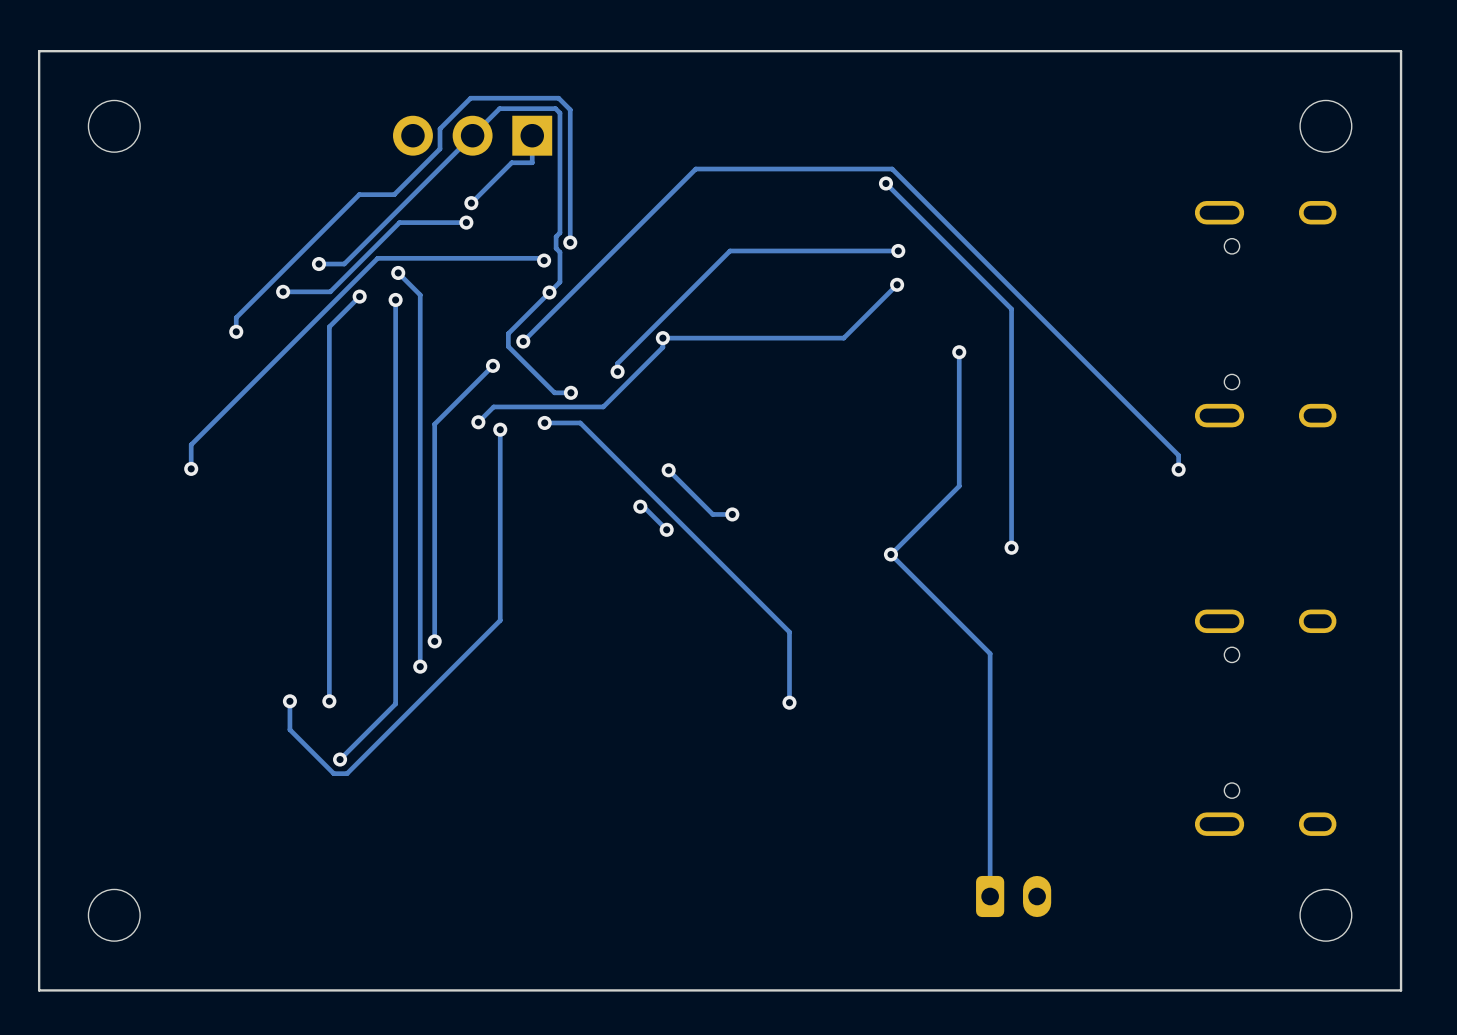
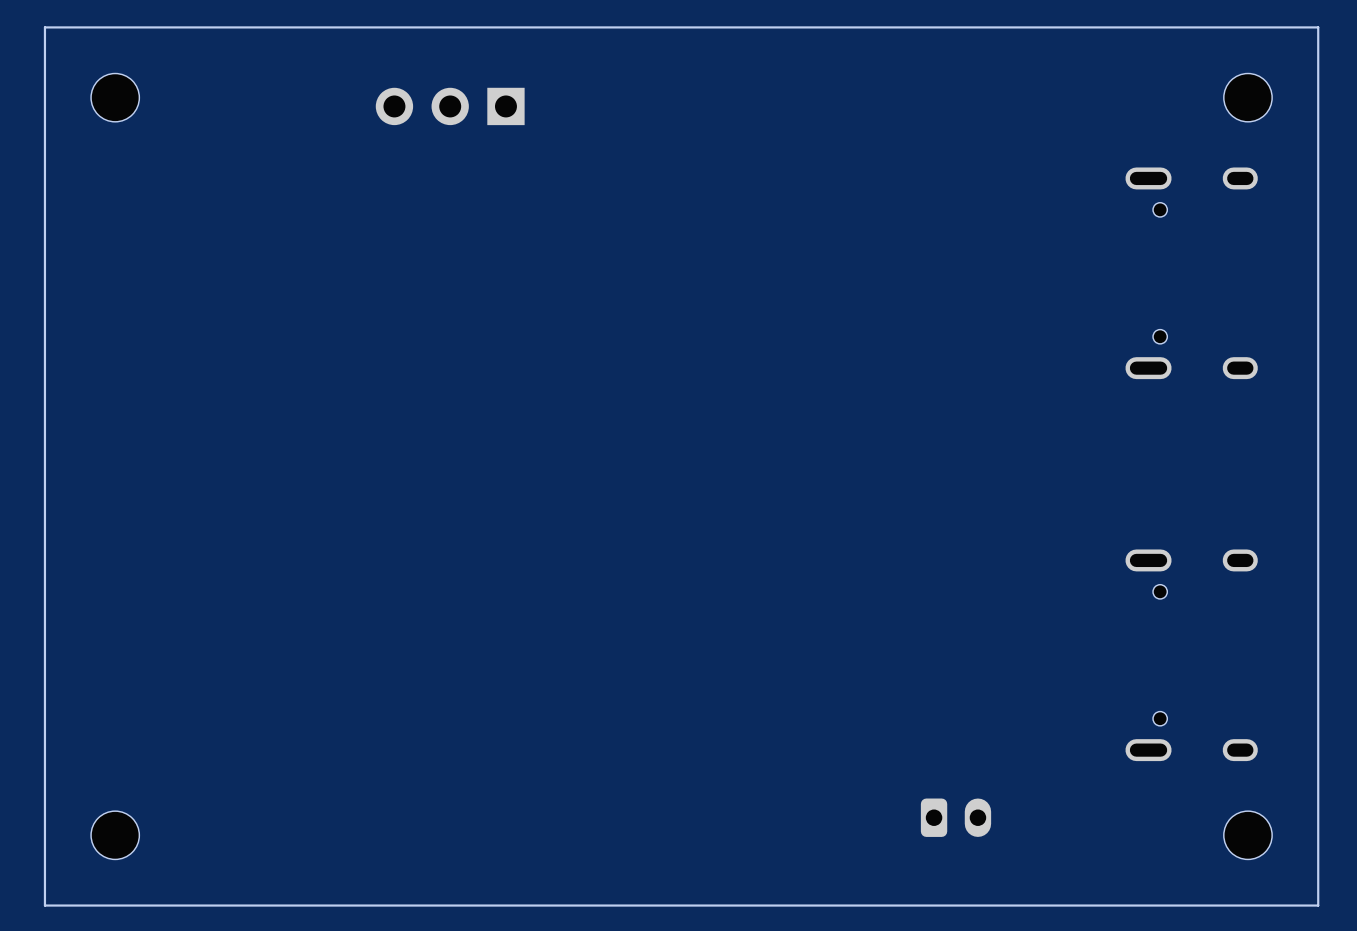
track: (532, 135) (532, 162) (511, 162) (471, 203) -> none
track: (885, 183) (1011, 309) (1011, 547) -> none
via: (885, 183) -> none
via: (471, 203) -> none
track: (466, 222) (399, 222) (330, 291) (283, 291) -> none
via: (466, 222) -> none
track: (570, 242) (570, 109) (558, 98) (470, 98) (440, 128) (440, 148) (394, 194) (359, 194) (236, 317) (236, 331) -> none
via: (570, 242) -> none
track: (898, 250) (730, 250) (617, 363) (617, 371) -> none
via: (898, 250) -> none
track: (544, 260) (541, 258) (377, 258) (191, 444) (191, 468) -> none
via: (544, 260) -> none
track: (318, 264) (344, 264) (499, 108) (555, 108) (559, 113) (559, 232) (556, 236) (556, 248) (559, 252) (559, 282) (508, 333) (508, 346) (554, 392) (570, 392) -> none
via: (318, 264) -> none
track: (398, 272) (420, 294) (420, 666) -> none
via: (398, 272) -> none
track: (897, 284) (843, 338) (662, 338) (662, 347) (603, 406) (493, 406) (478, 422) -> none
via: (897, 284) -> none
via: (283, 291) -> none
via: (549, 292) -> none
track: (359, 296) (329, 326) (329, 701) -> none
via: (359, 296) -> none
track: (395, 299) (395, 703) (340, 759) -> none
via: (395, 299) -> none
via: (236, 331) -> none
via: (662, 338) -> none
track: (523, 341) (695, 169) (892, 169) (1178, 455) (1178, 469) -> none
via: (523, 341) -> none
track: (959, 352) (959, 486) (890, 554) (990, 653) (990, 896) -> none
via: (959, 352) -> none
track: (492, 365) (434, 424) (434, 641) -> none
via: (492, 365) -> none
via: (617, 371) -> none
via: (570, 392) -> none
via: (478, 422) -> none
track: (544, 422) (580, 422) (789, 632) (789, 702) -> none
via: (544, 422) -> none
track: (500, 429) (500, 620) (347, 773) (333, 773) (289, 729) (289, 701) -> none
via: (500, 429) -> none
via: (191, 468) -> none
via: (1178, 469) -> none
track: (668, 470) (712, 514) (732, 514) -> none
via: (668, 470) -> none
track: (640, 506) (643, 506) (666, 529) -> none
via: (640, 506) -> none
via: (732, 514) -> none
via: (666, 529) -> none
via: (1011, 547) -> none
via: (890, 554) -> none
via: (434, 641) -> none
via: (420, 666) -> none
via: (289, 701) -> none
via: (329, 701) -> none
via: (789, 702) -> none
via: (340, 759) -> none

